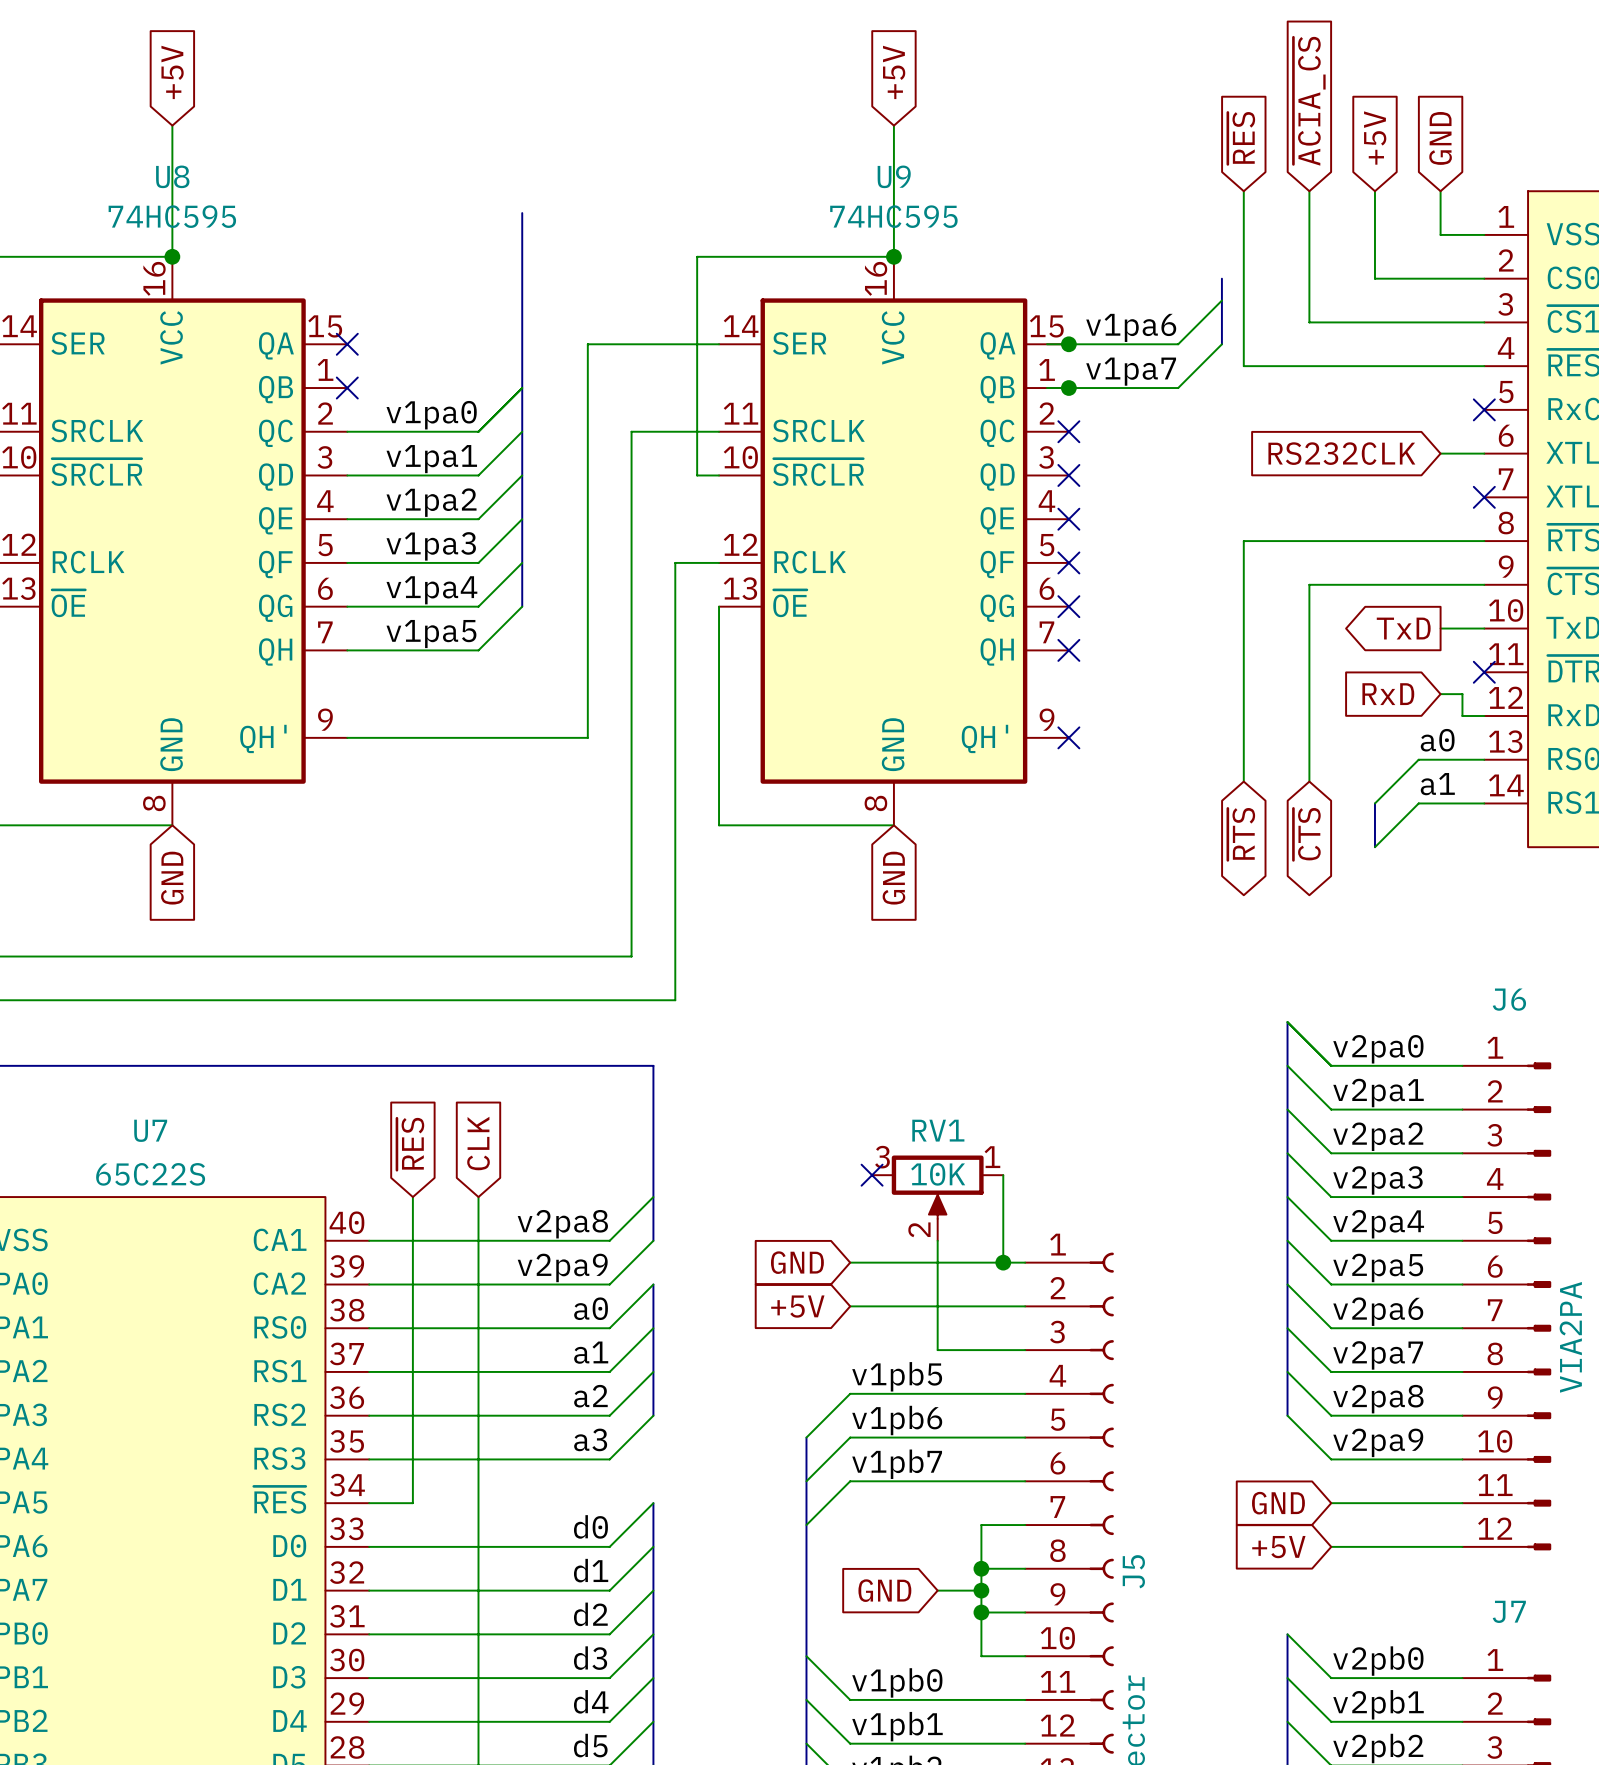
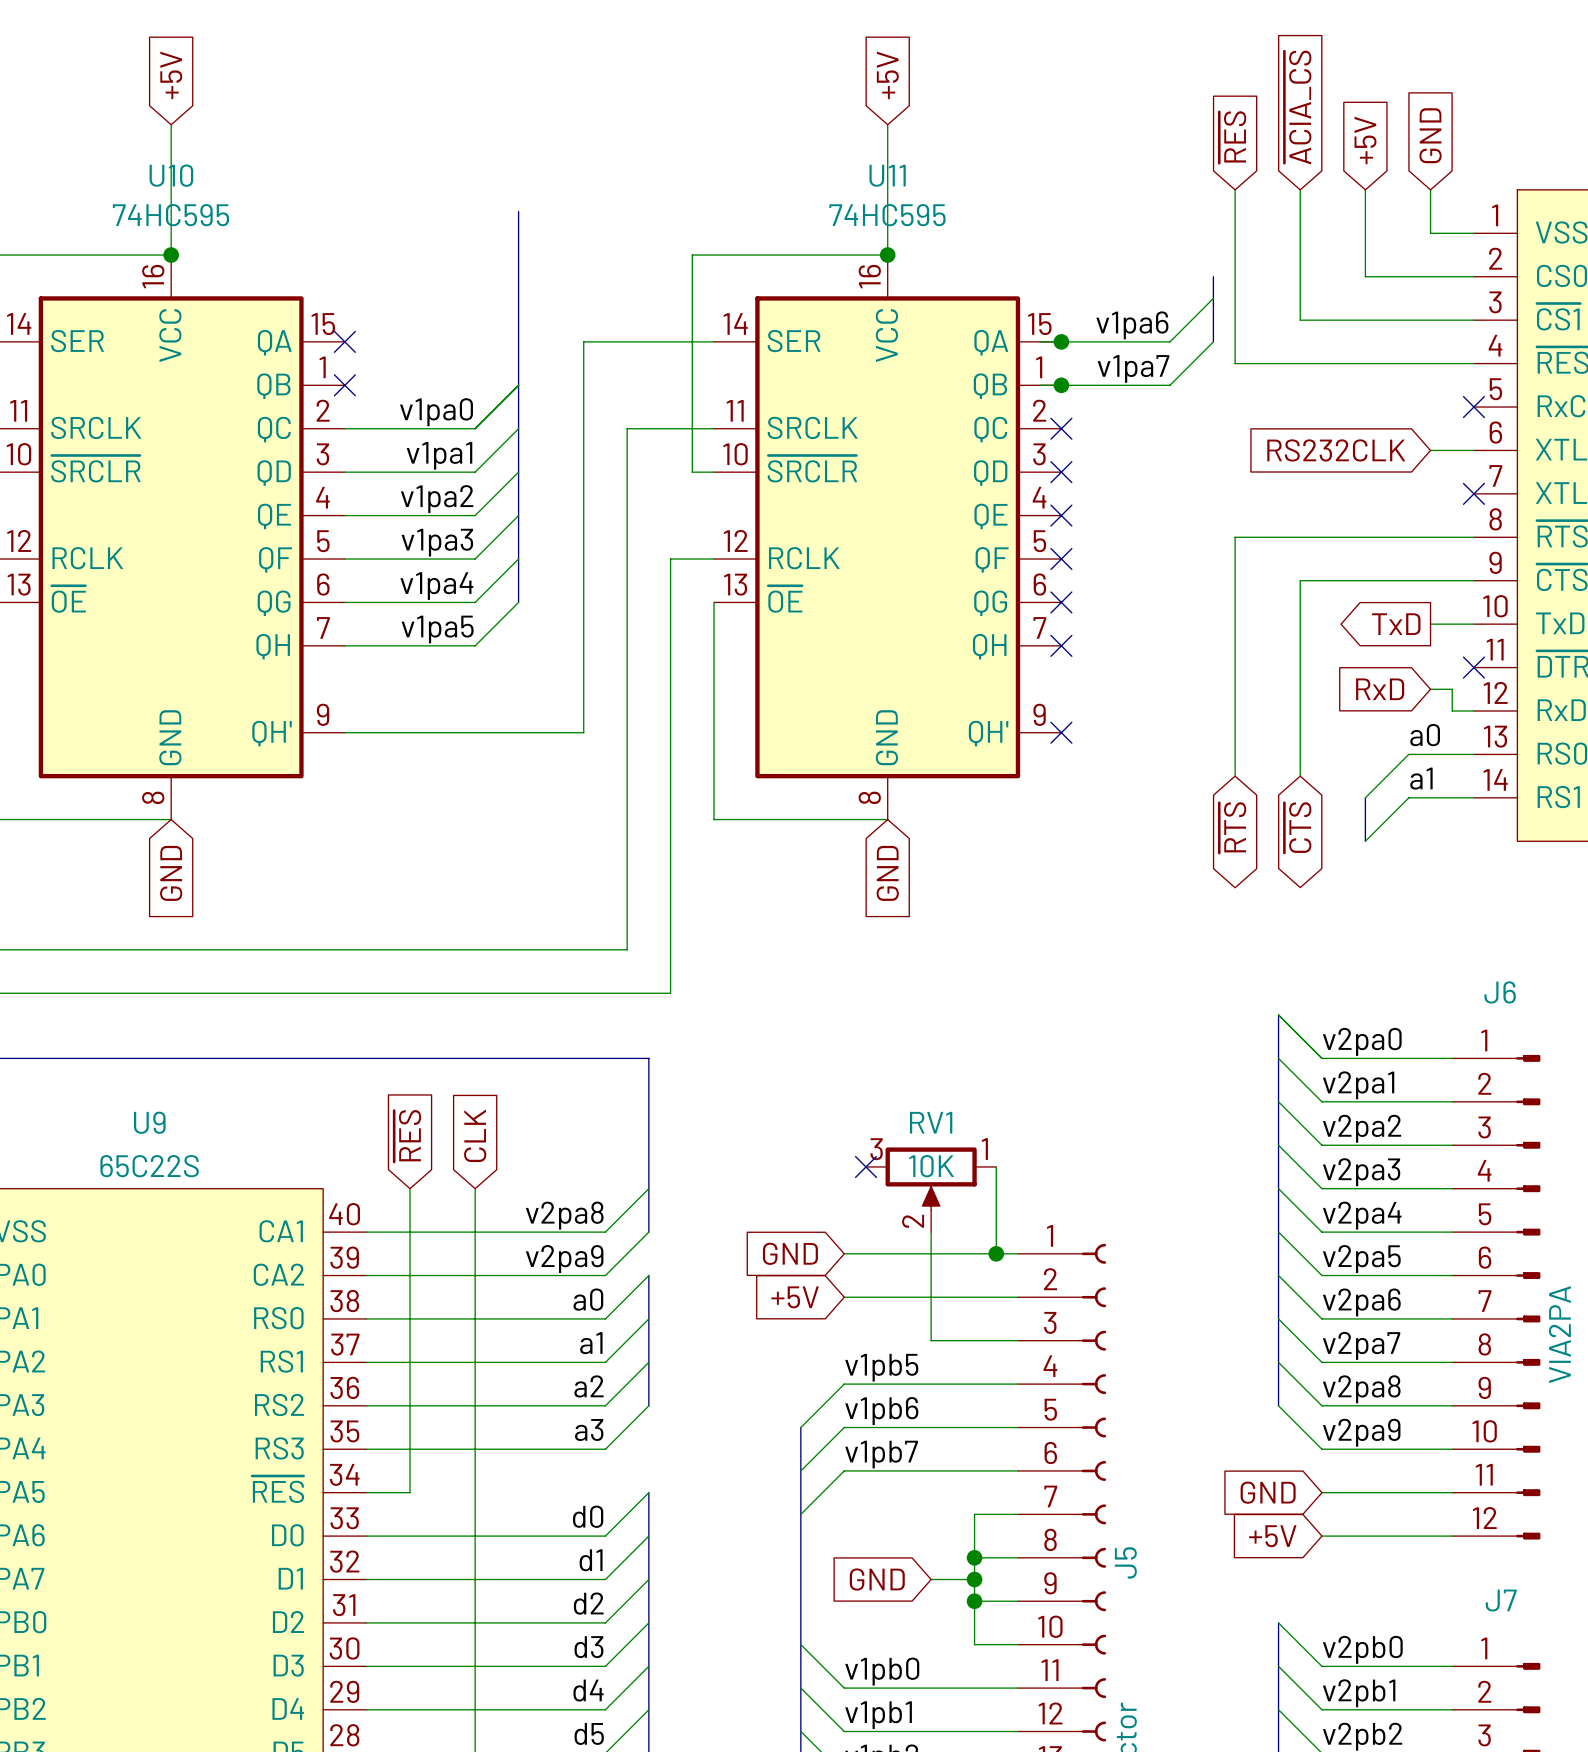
U8 name: U8 (172, 176) -> U10 (171, 175)
U9 name: U9 (894, 176) -> U11 (887, 175)
U7 name: U7 (150, 1130) -> U9 (149, 1122)

